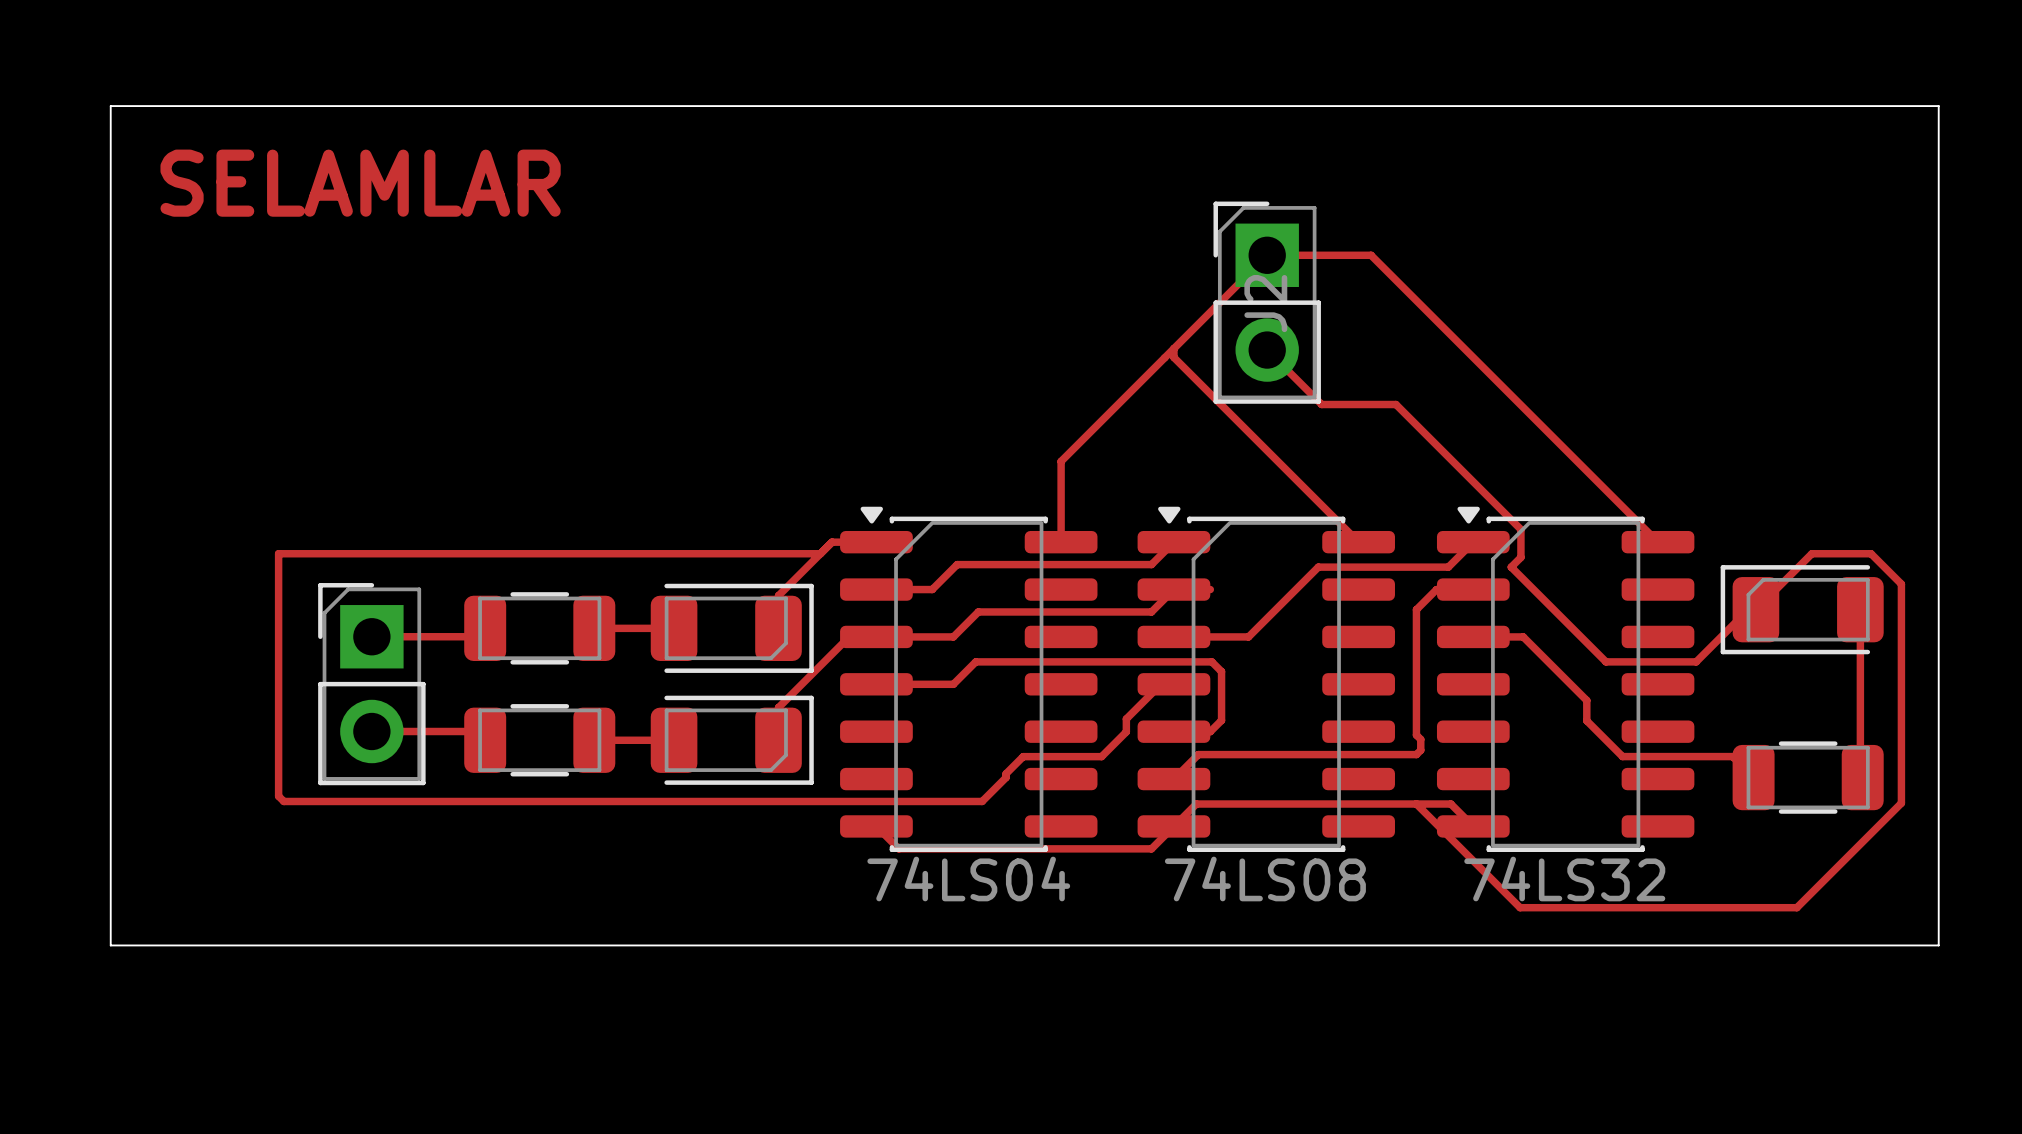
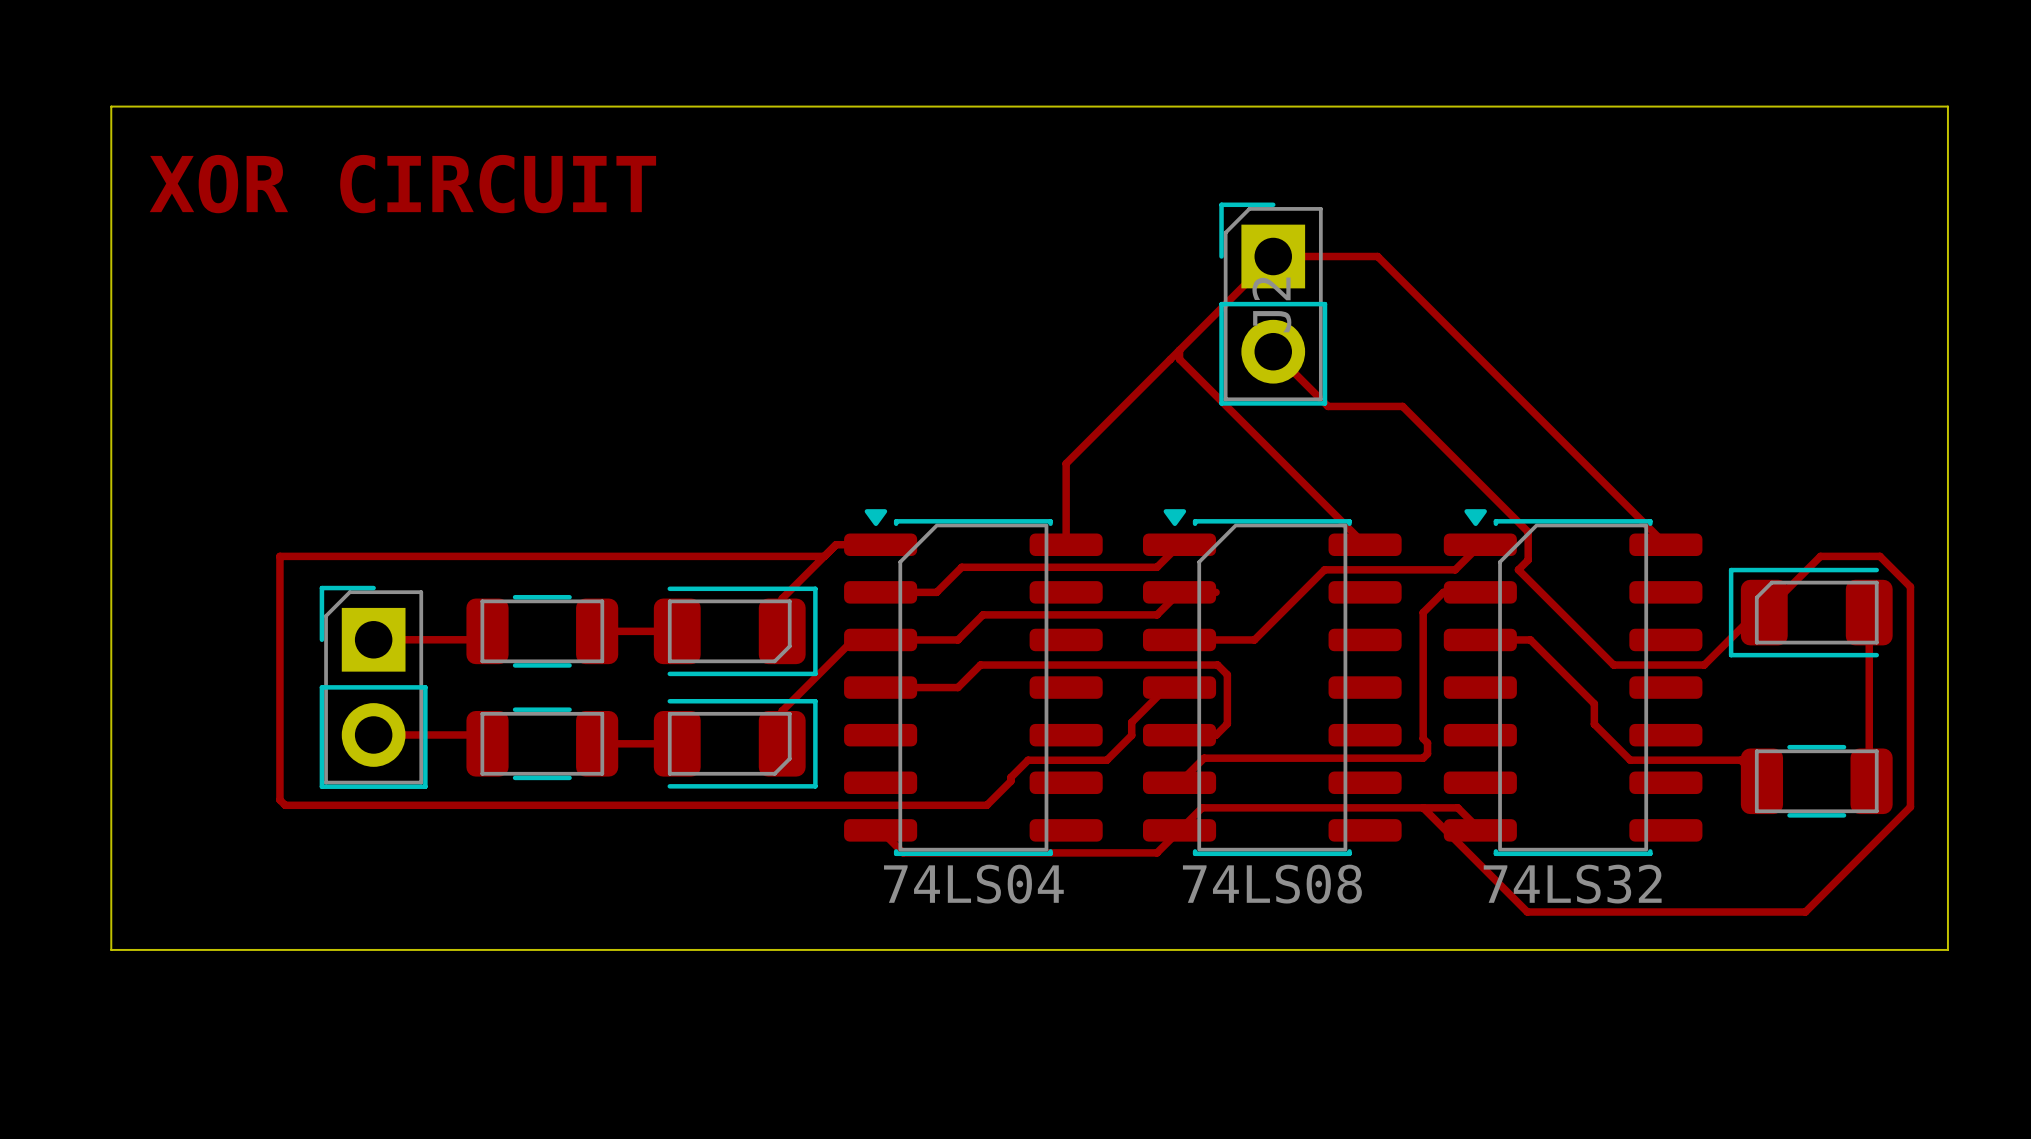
text: SELAMLAR (360, 183) -> XOR CIRCUIT (402, 184)

